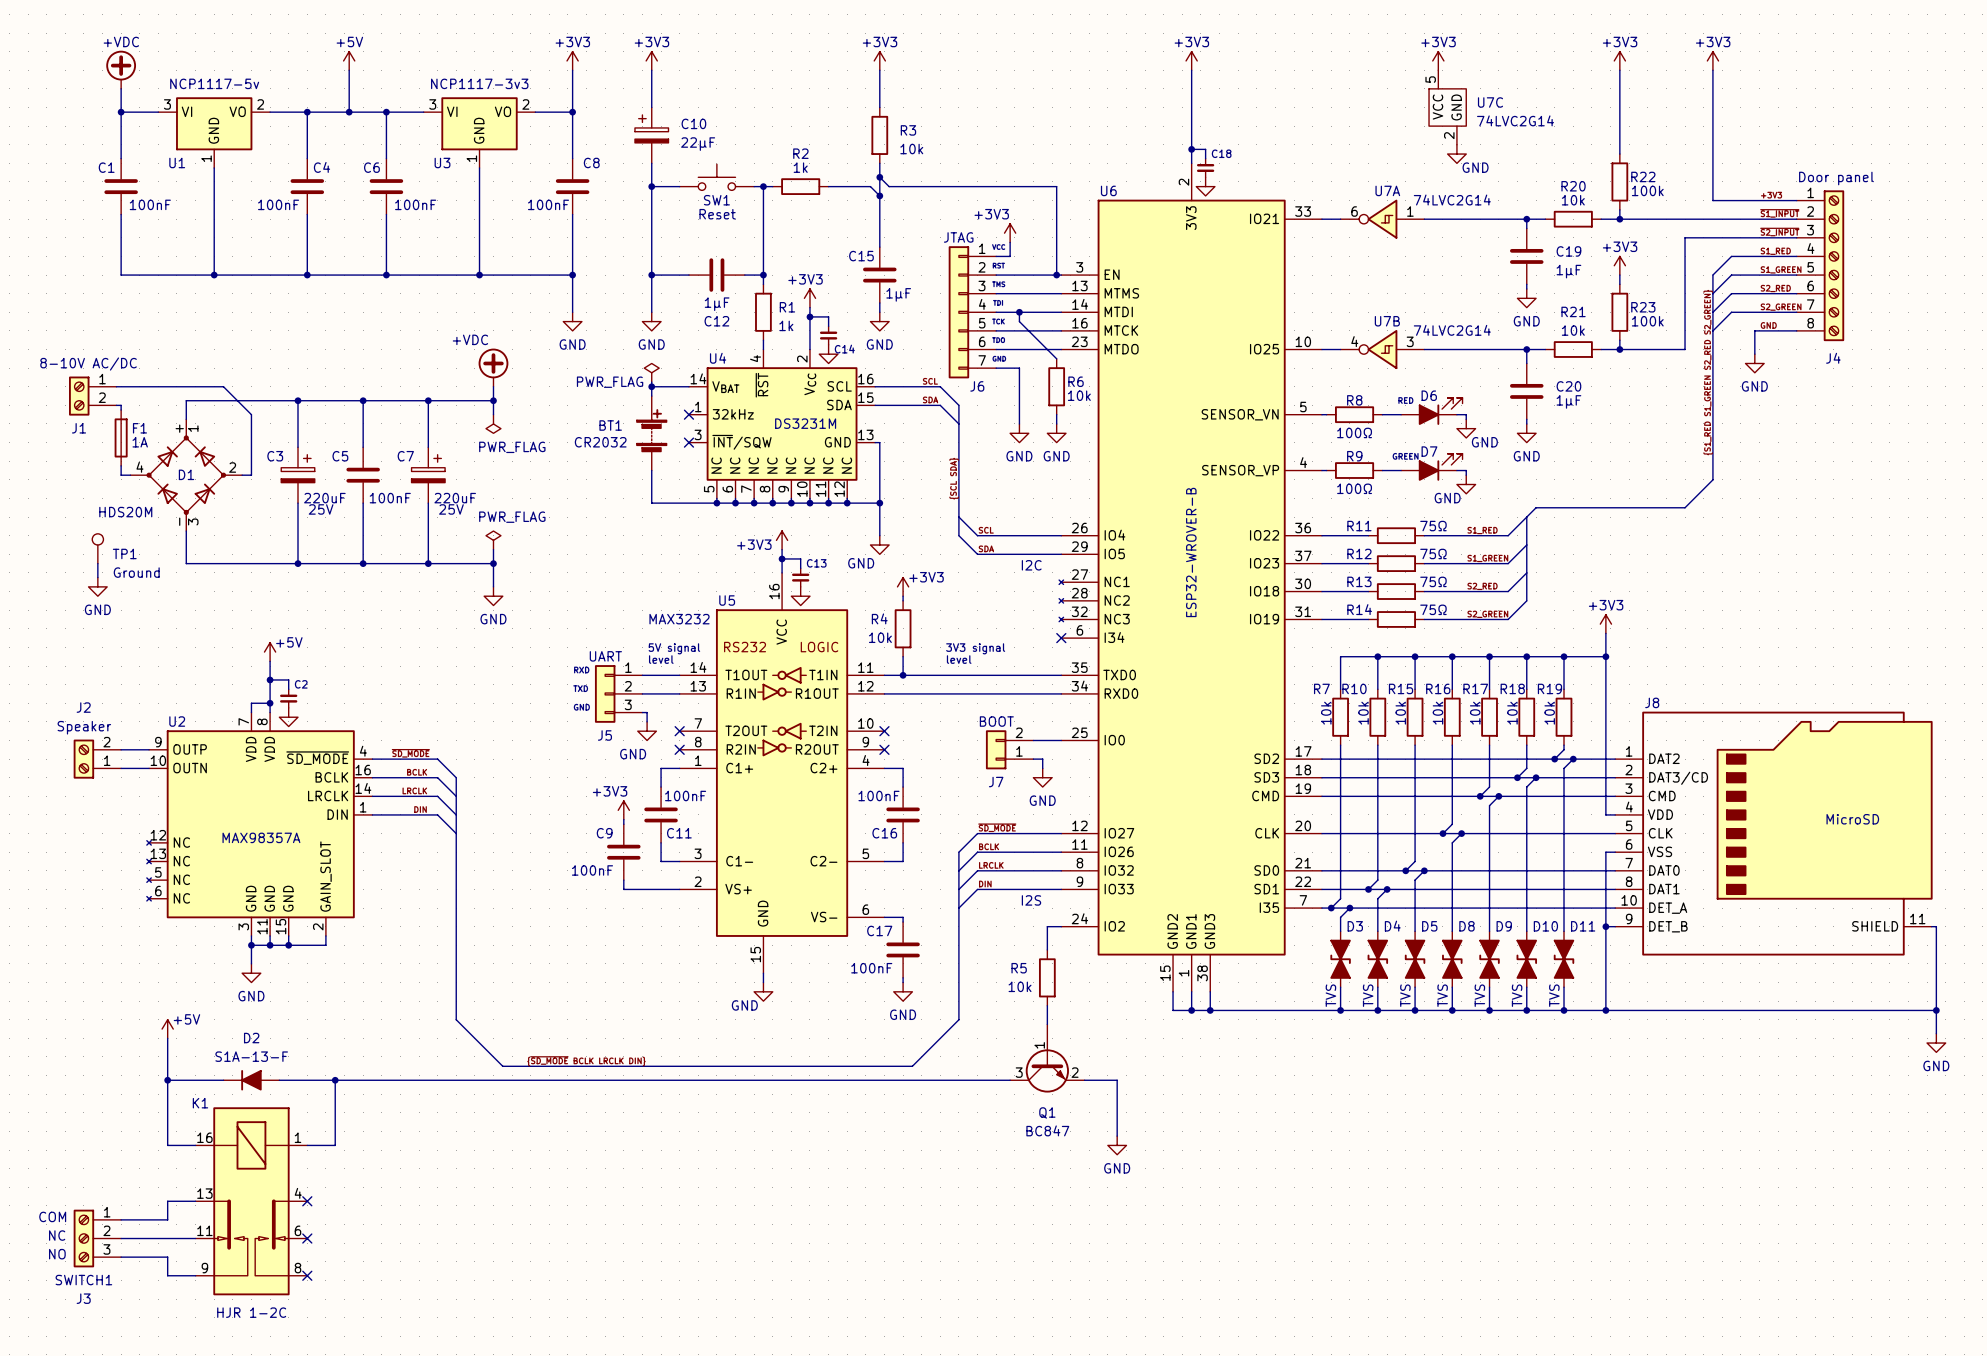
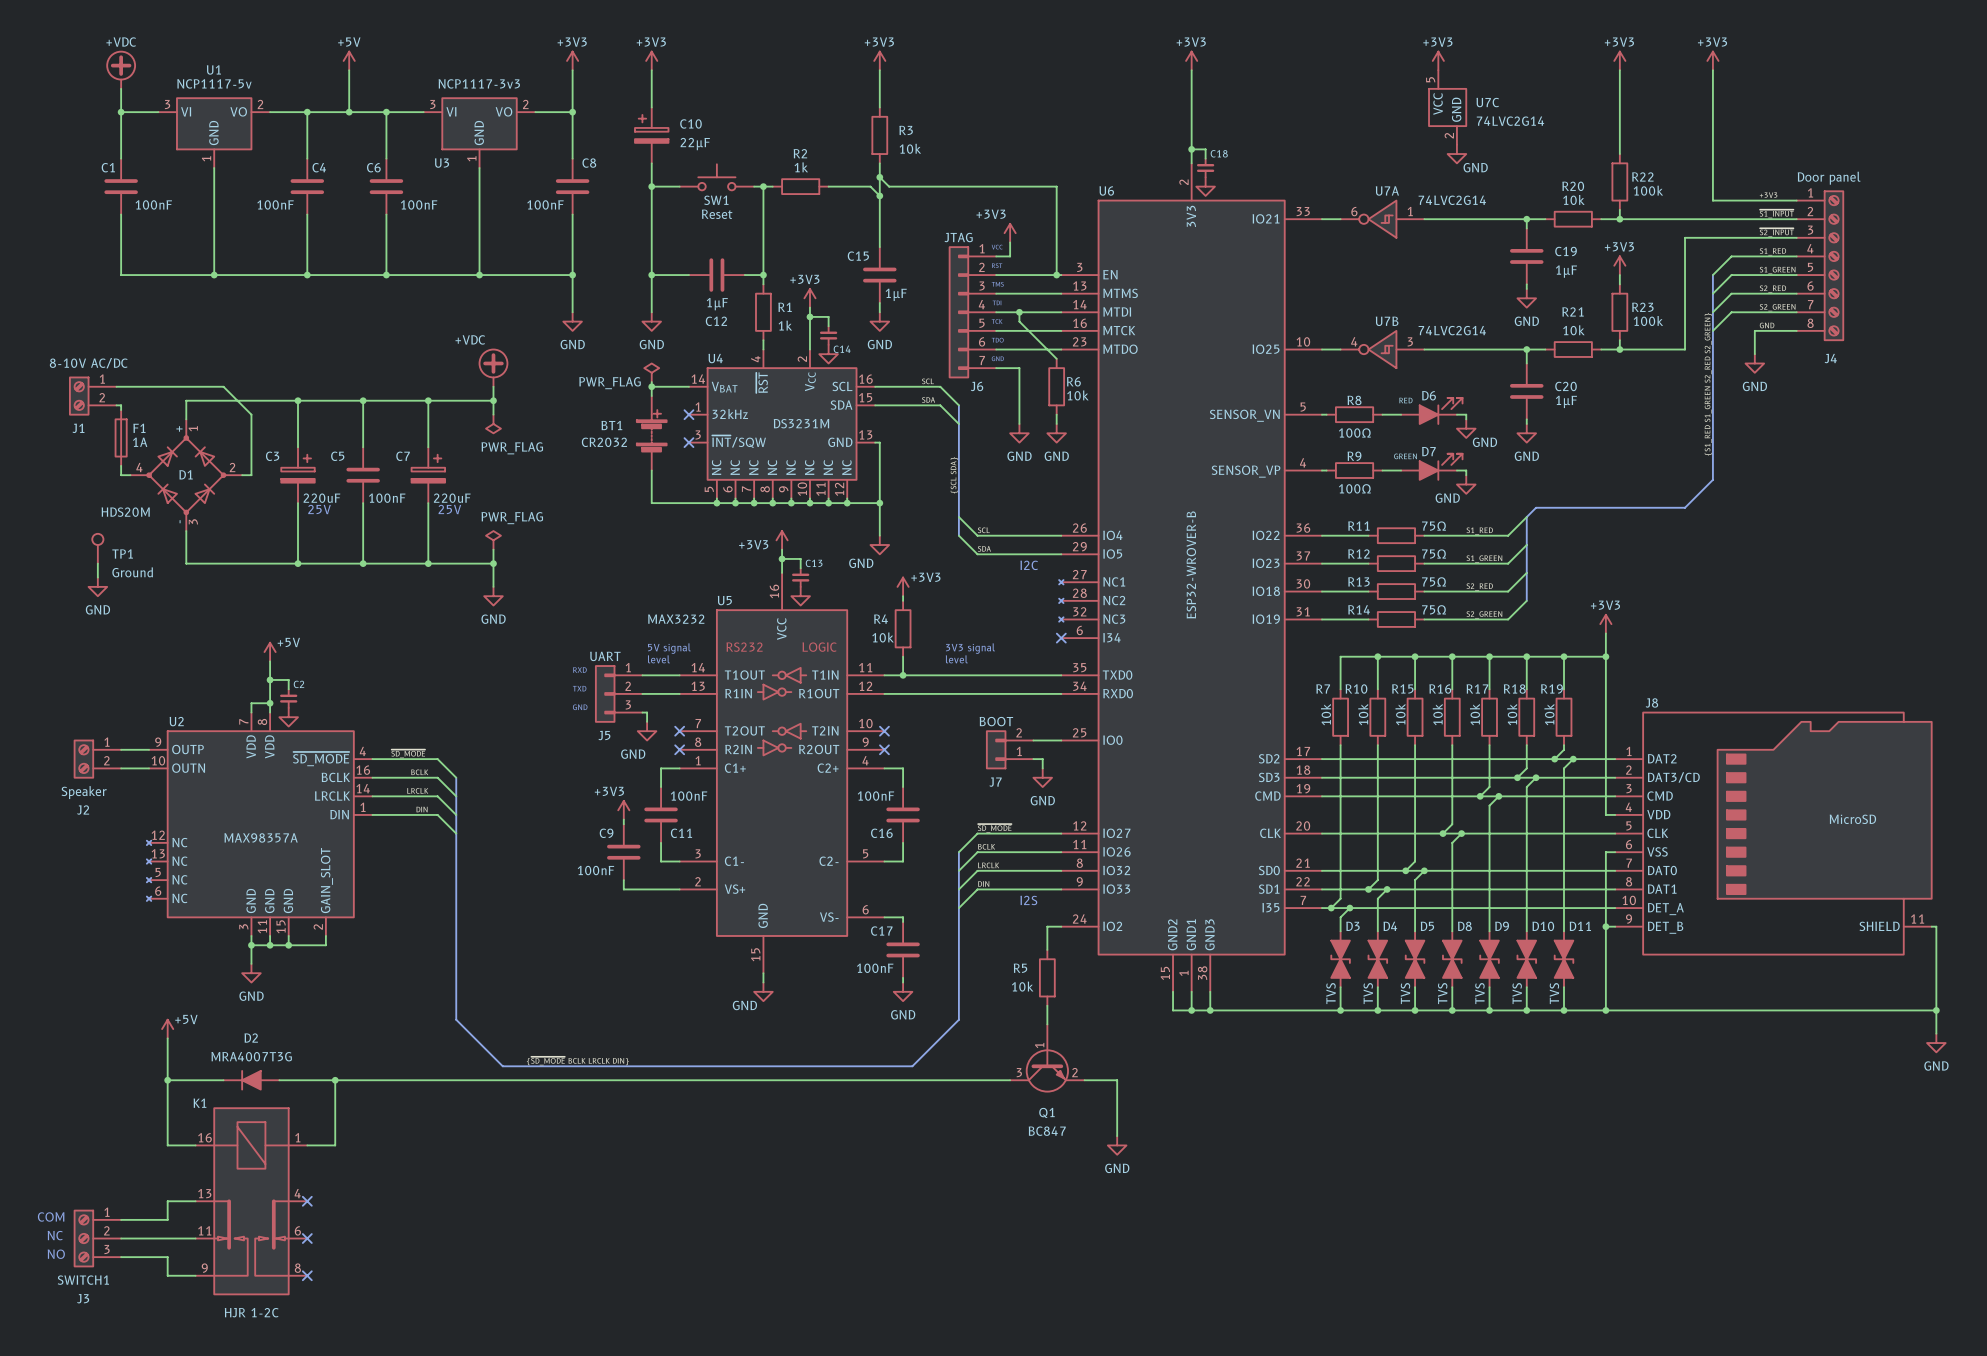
U1 name position: U1 (177, 162) -> U1 (213, 69)
J2 flip: as is (83, 759) -> up-down (83, 759)
D2 value: S1A-13-F (251, 1056) -> MRA4007T3G (251, 1056)

